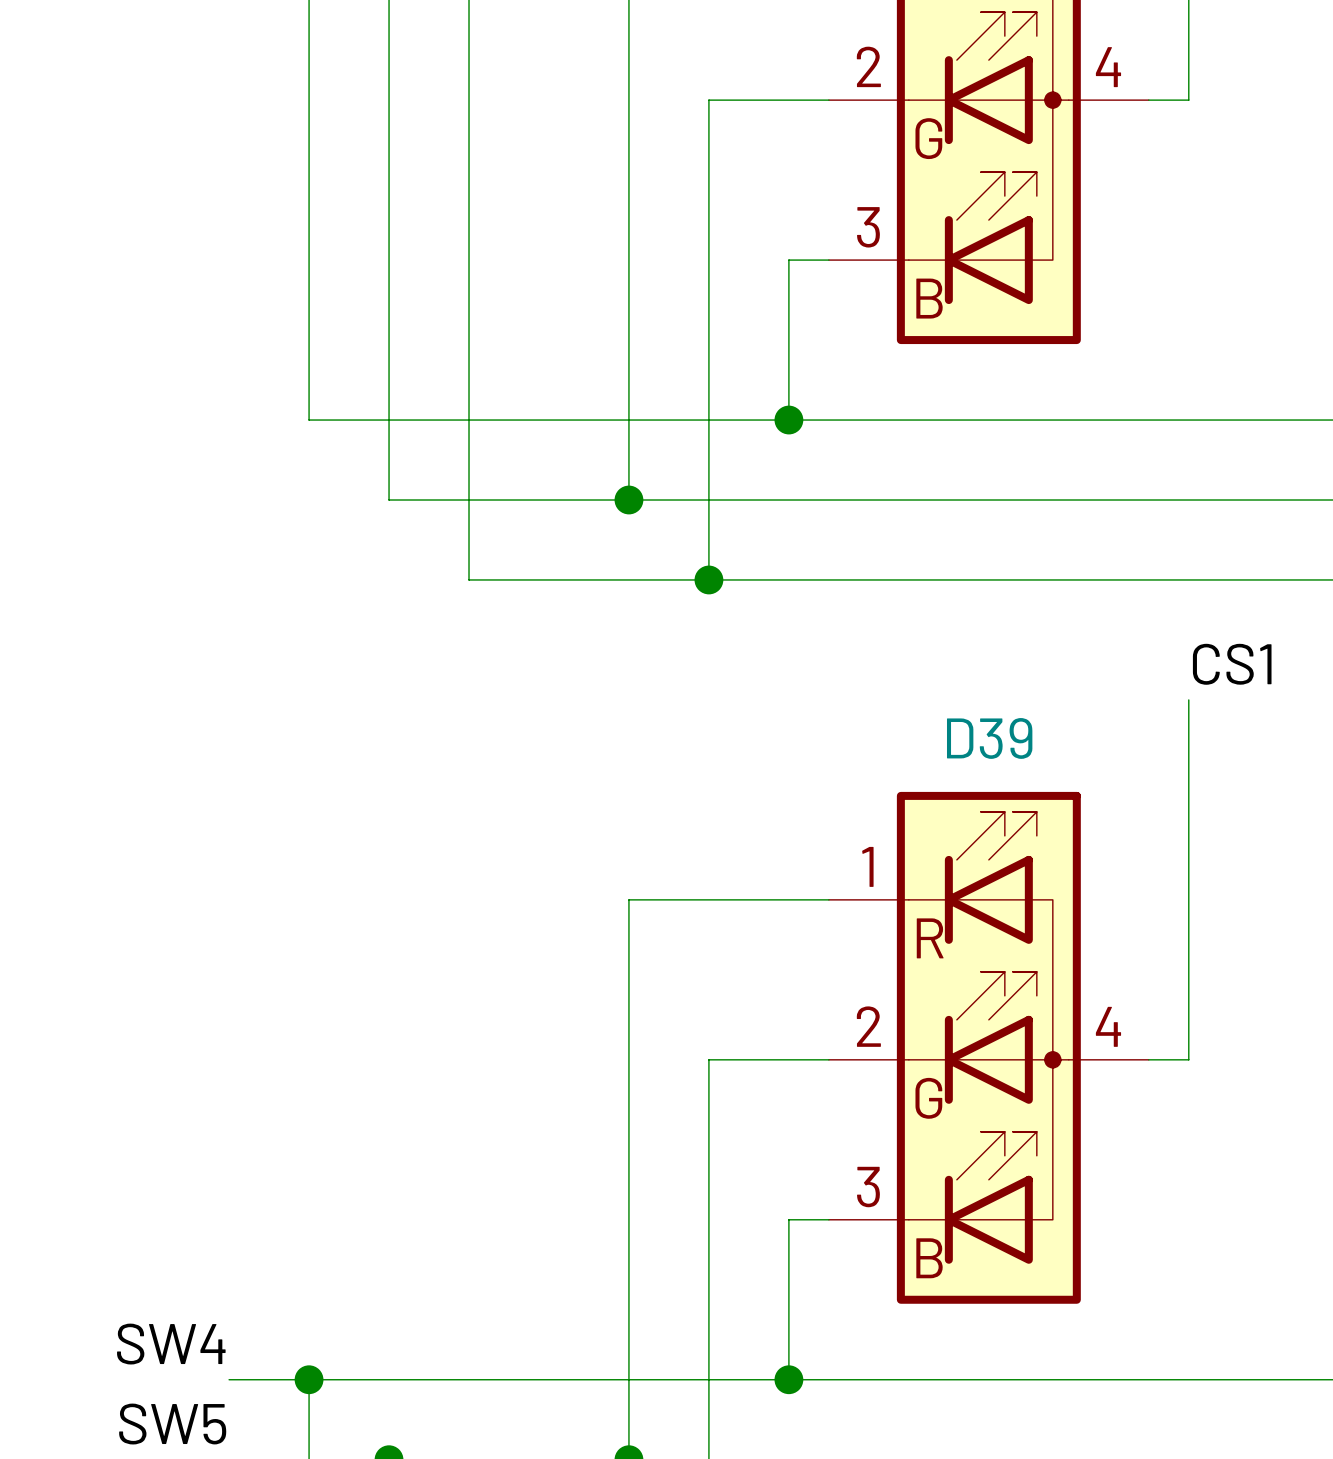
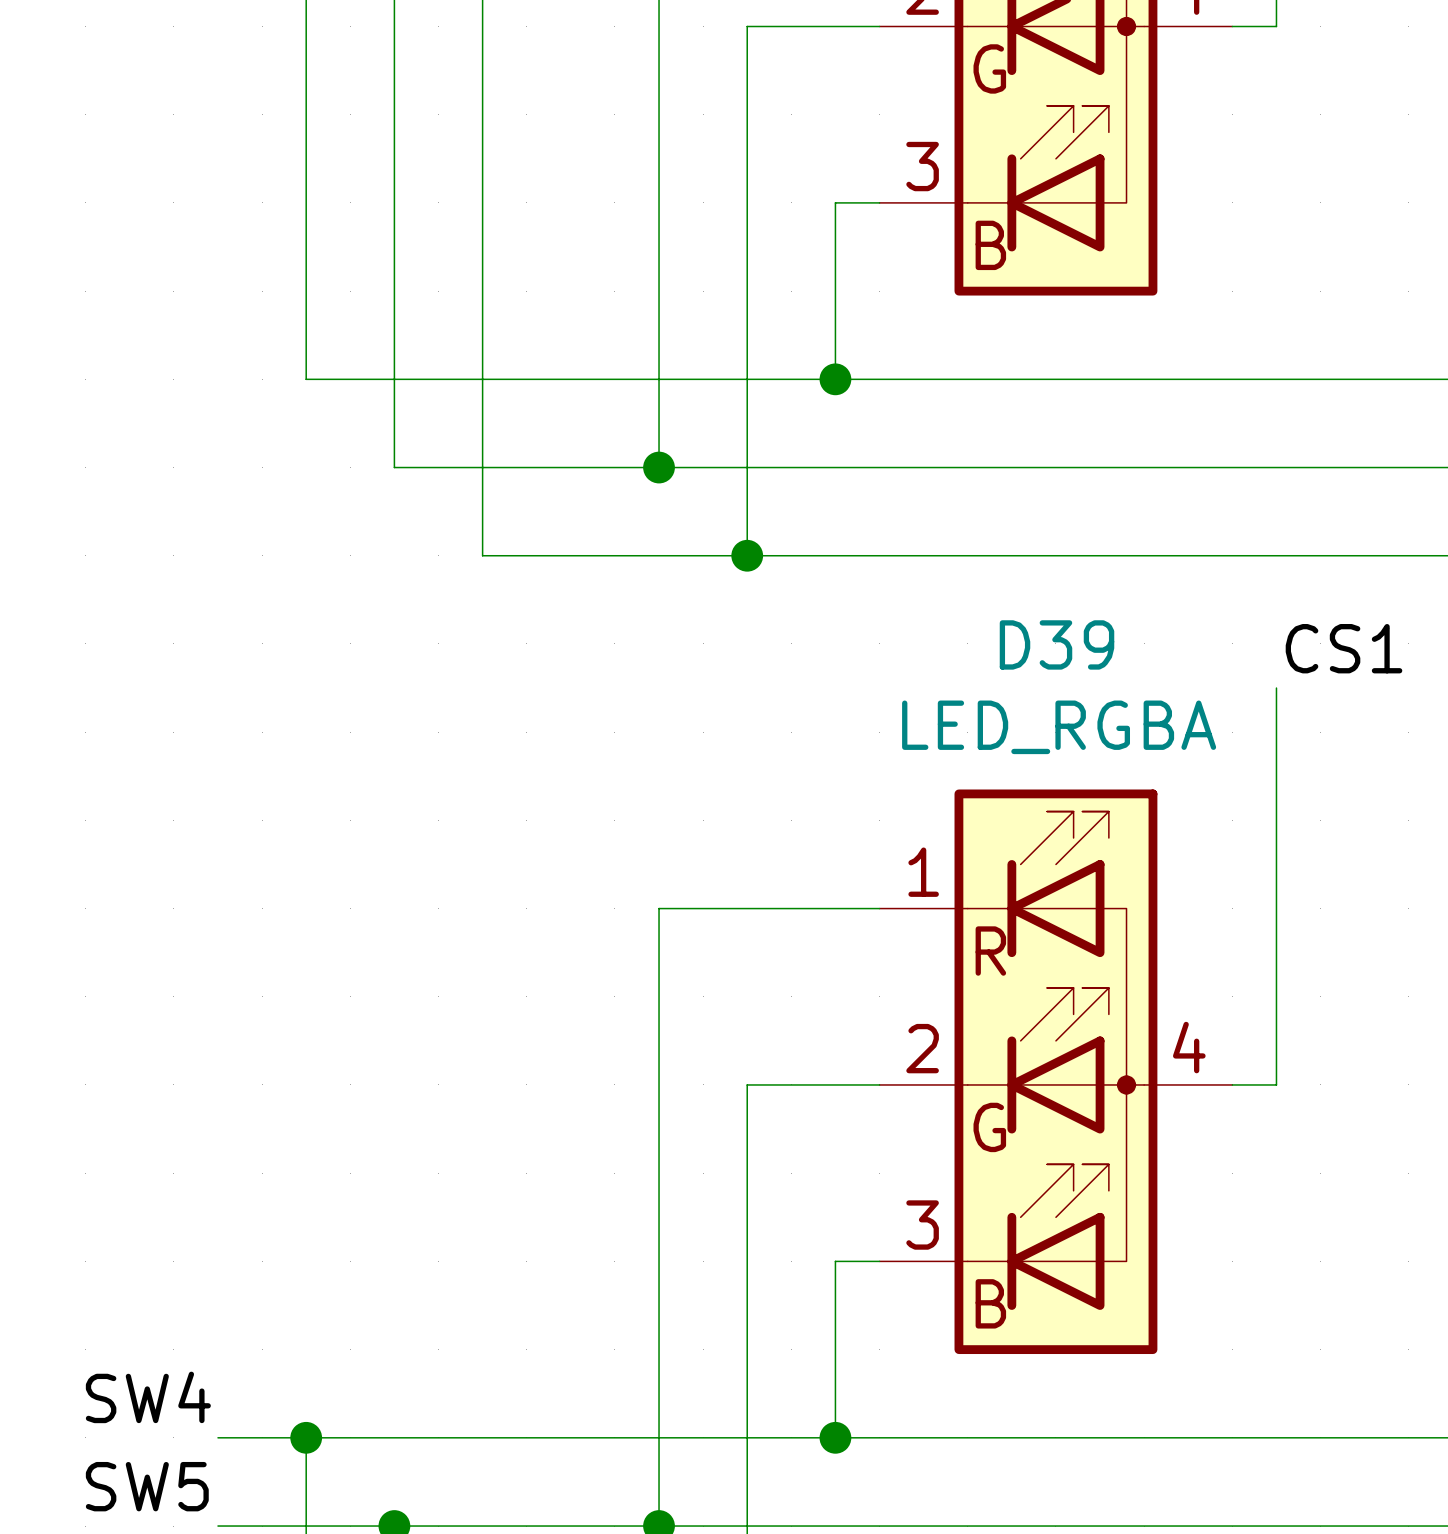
D39 value: none -> LED_RGBA (1059, 727)
D39 name position: D39 (989, 738) -> D39 (1057, 644)

